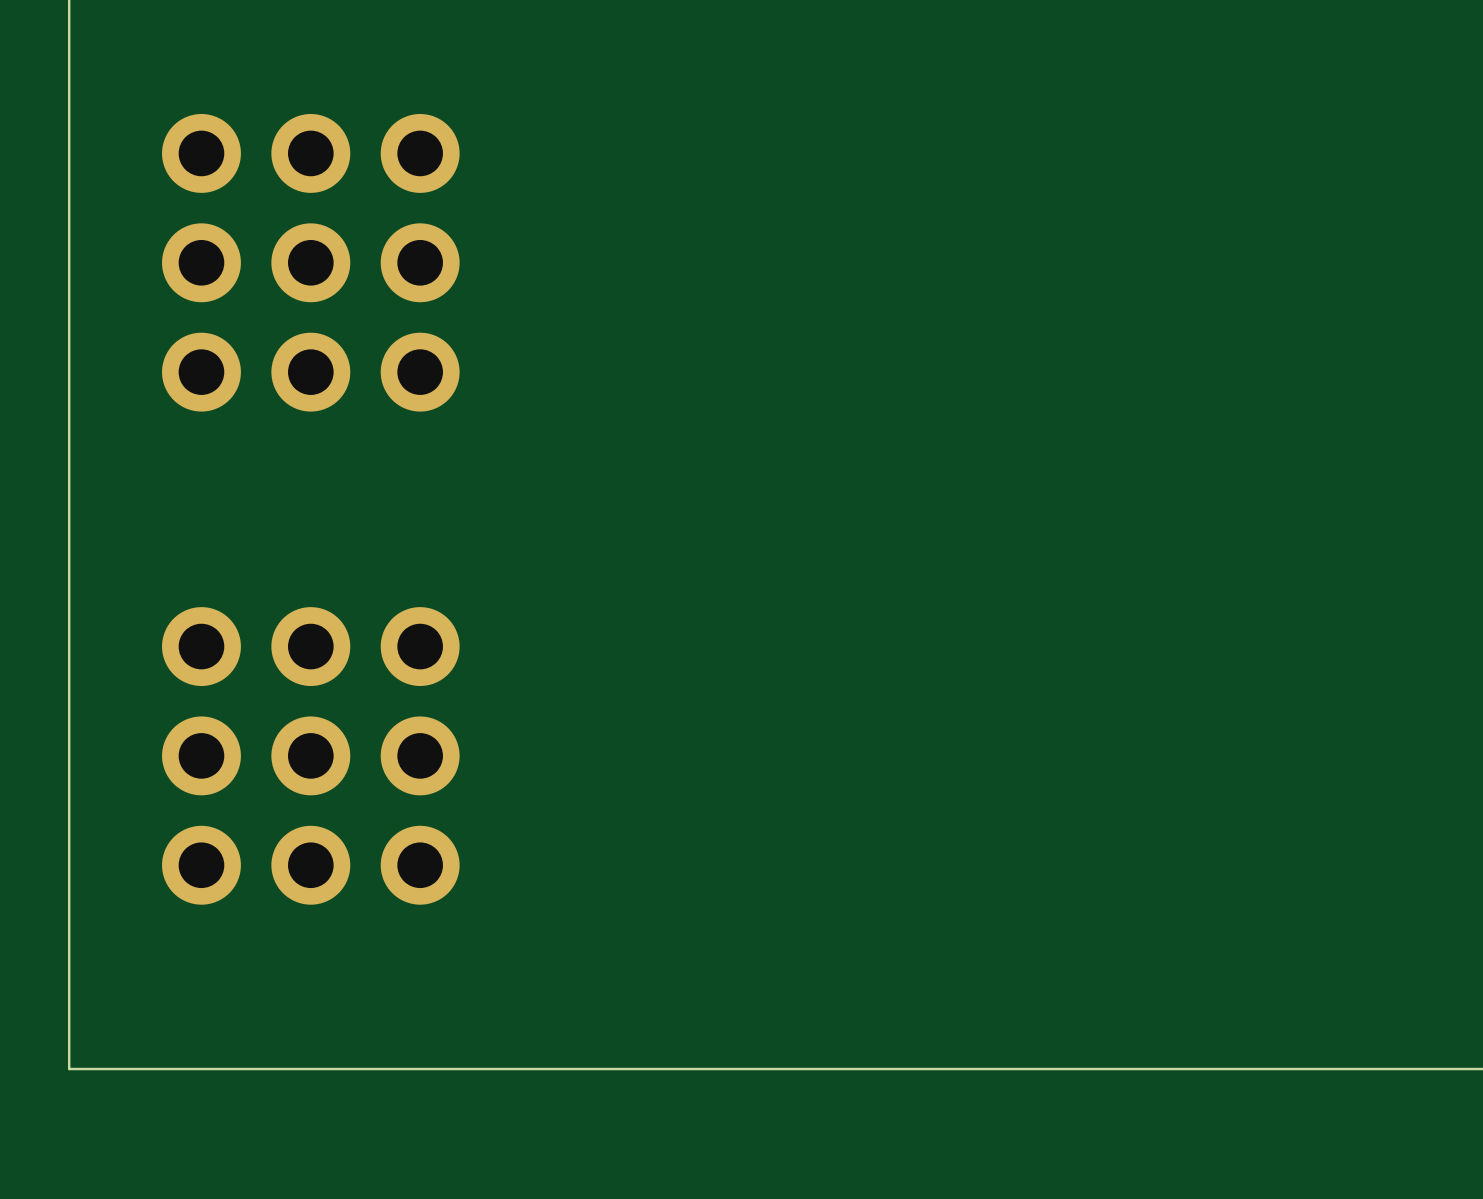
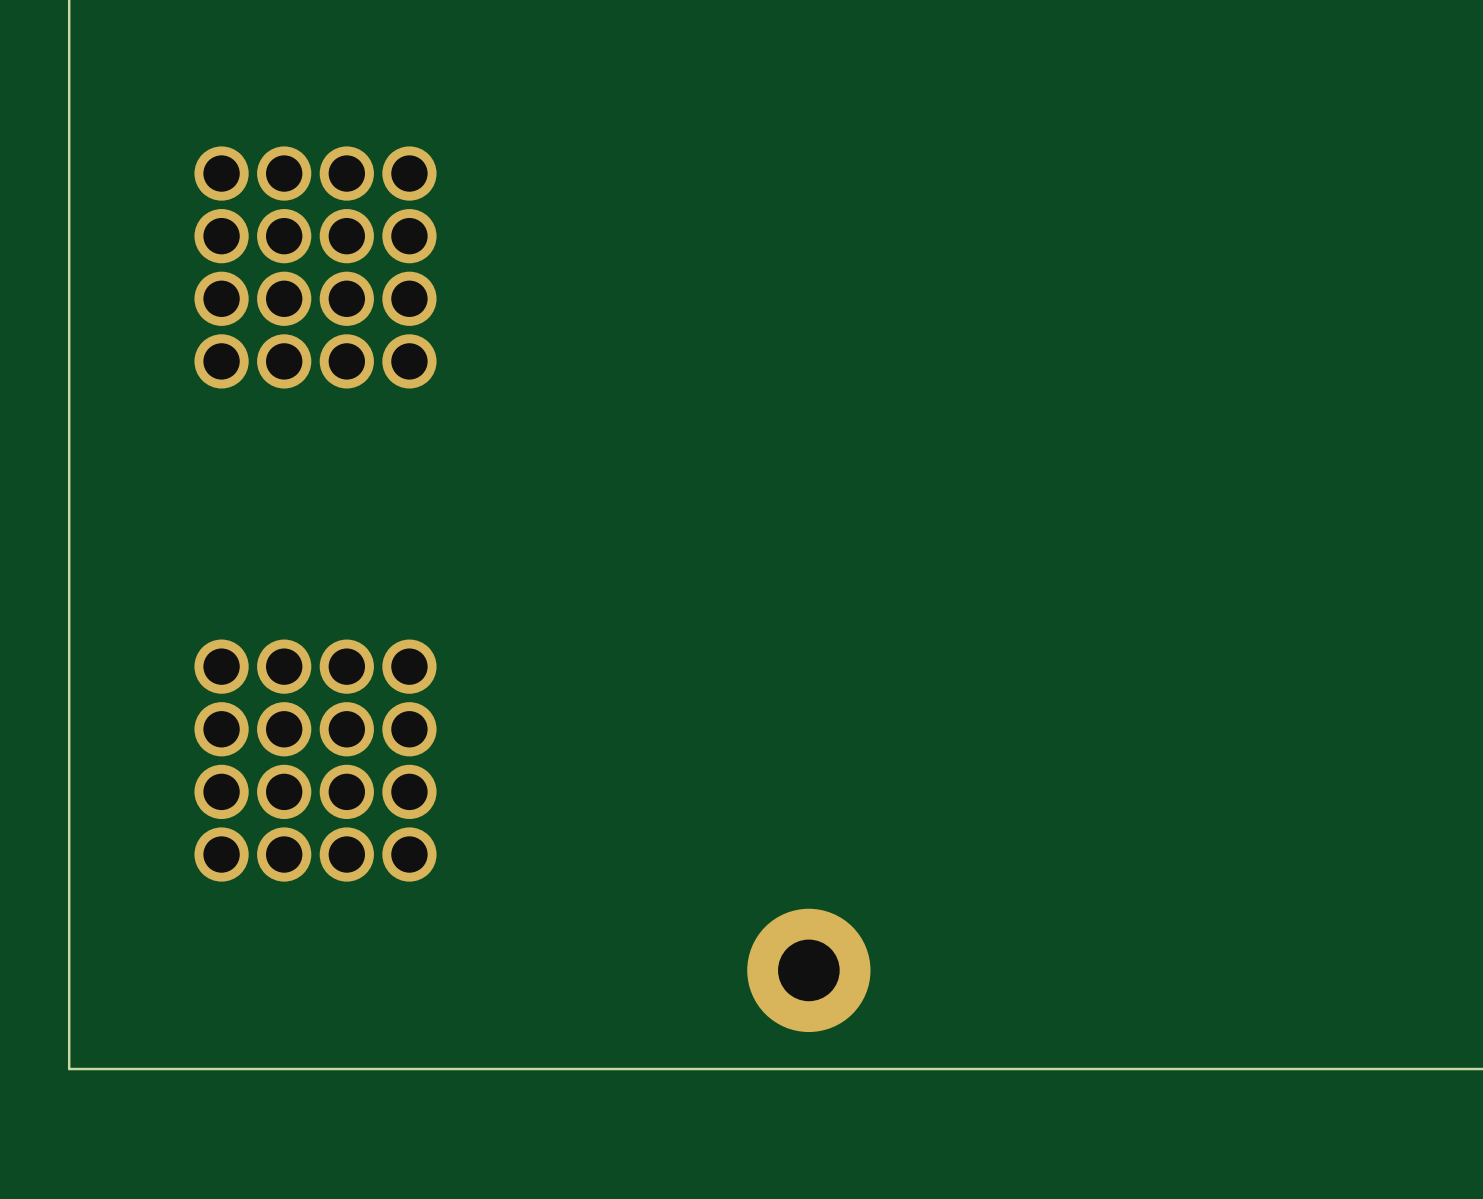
part footprint: [162, 113, 460, 412] -> [194, 146, 437, 389]
part footprint: [162, 607, 460, 905] -> [194, 639, 437, 882]
part: none -> (808, 970)

